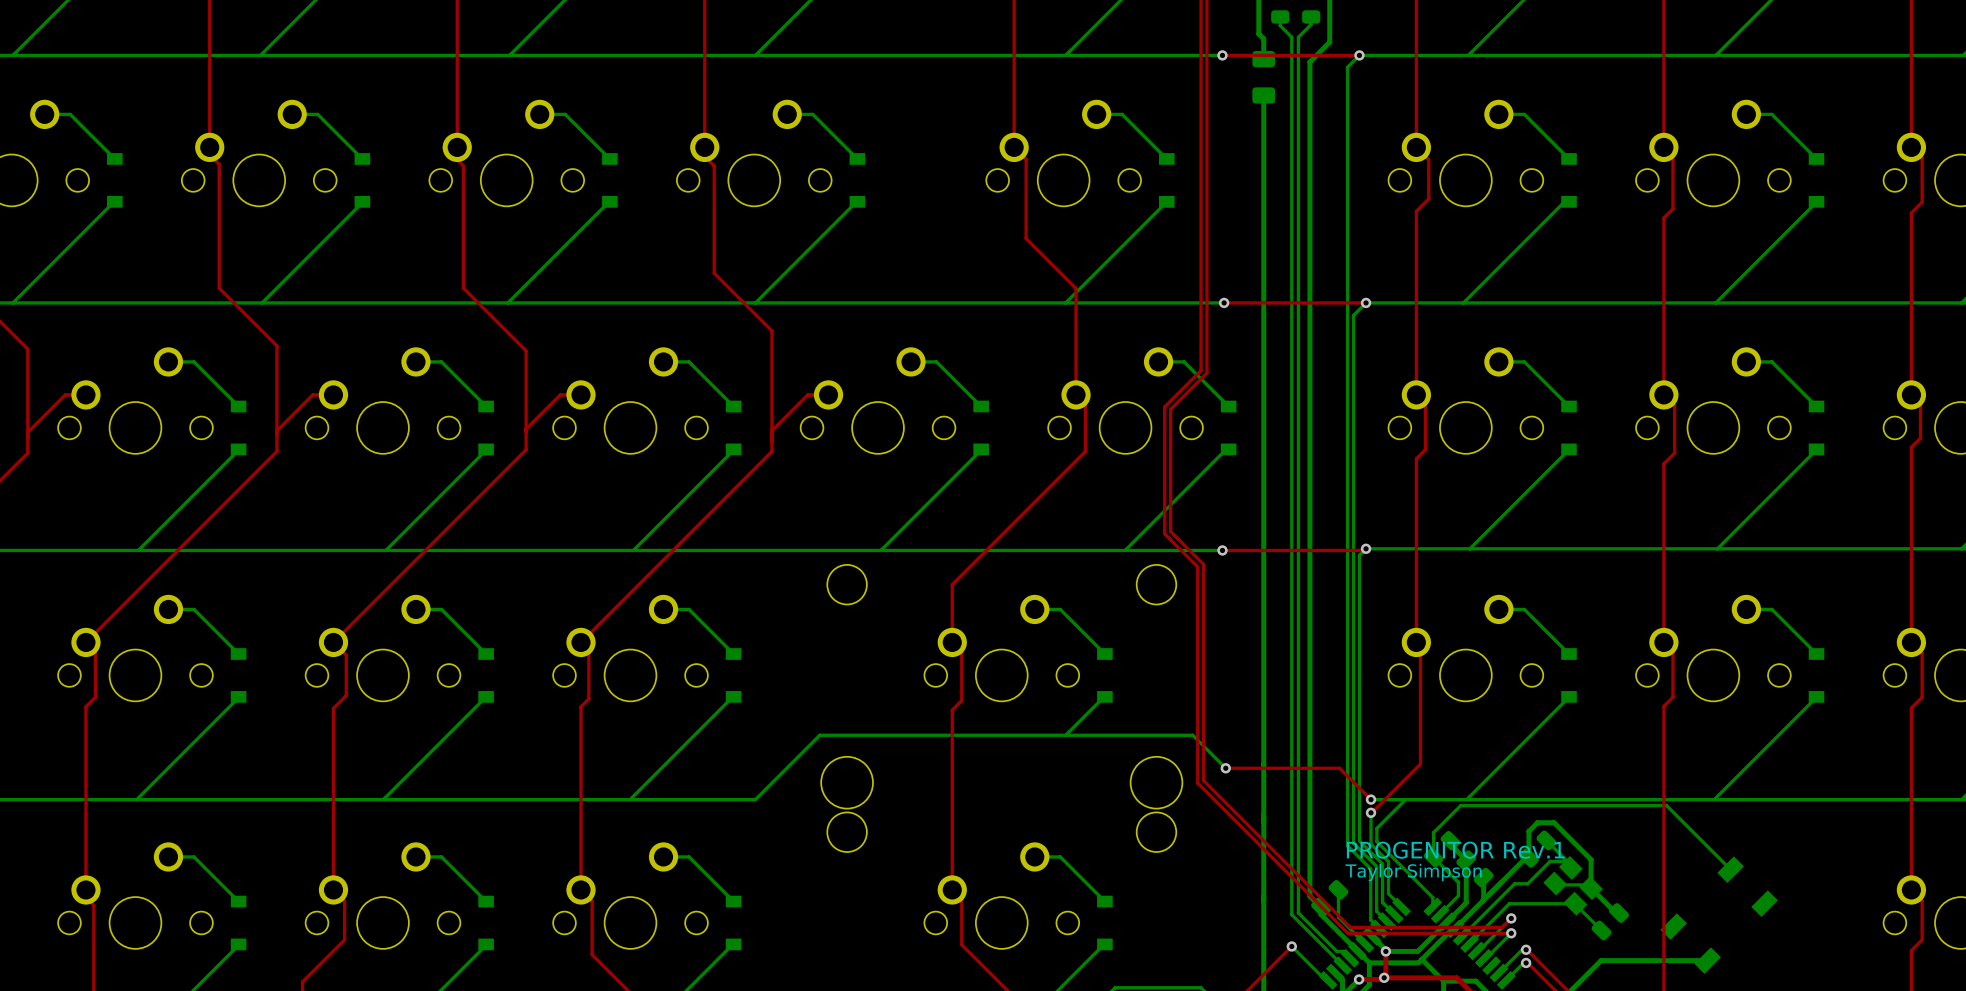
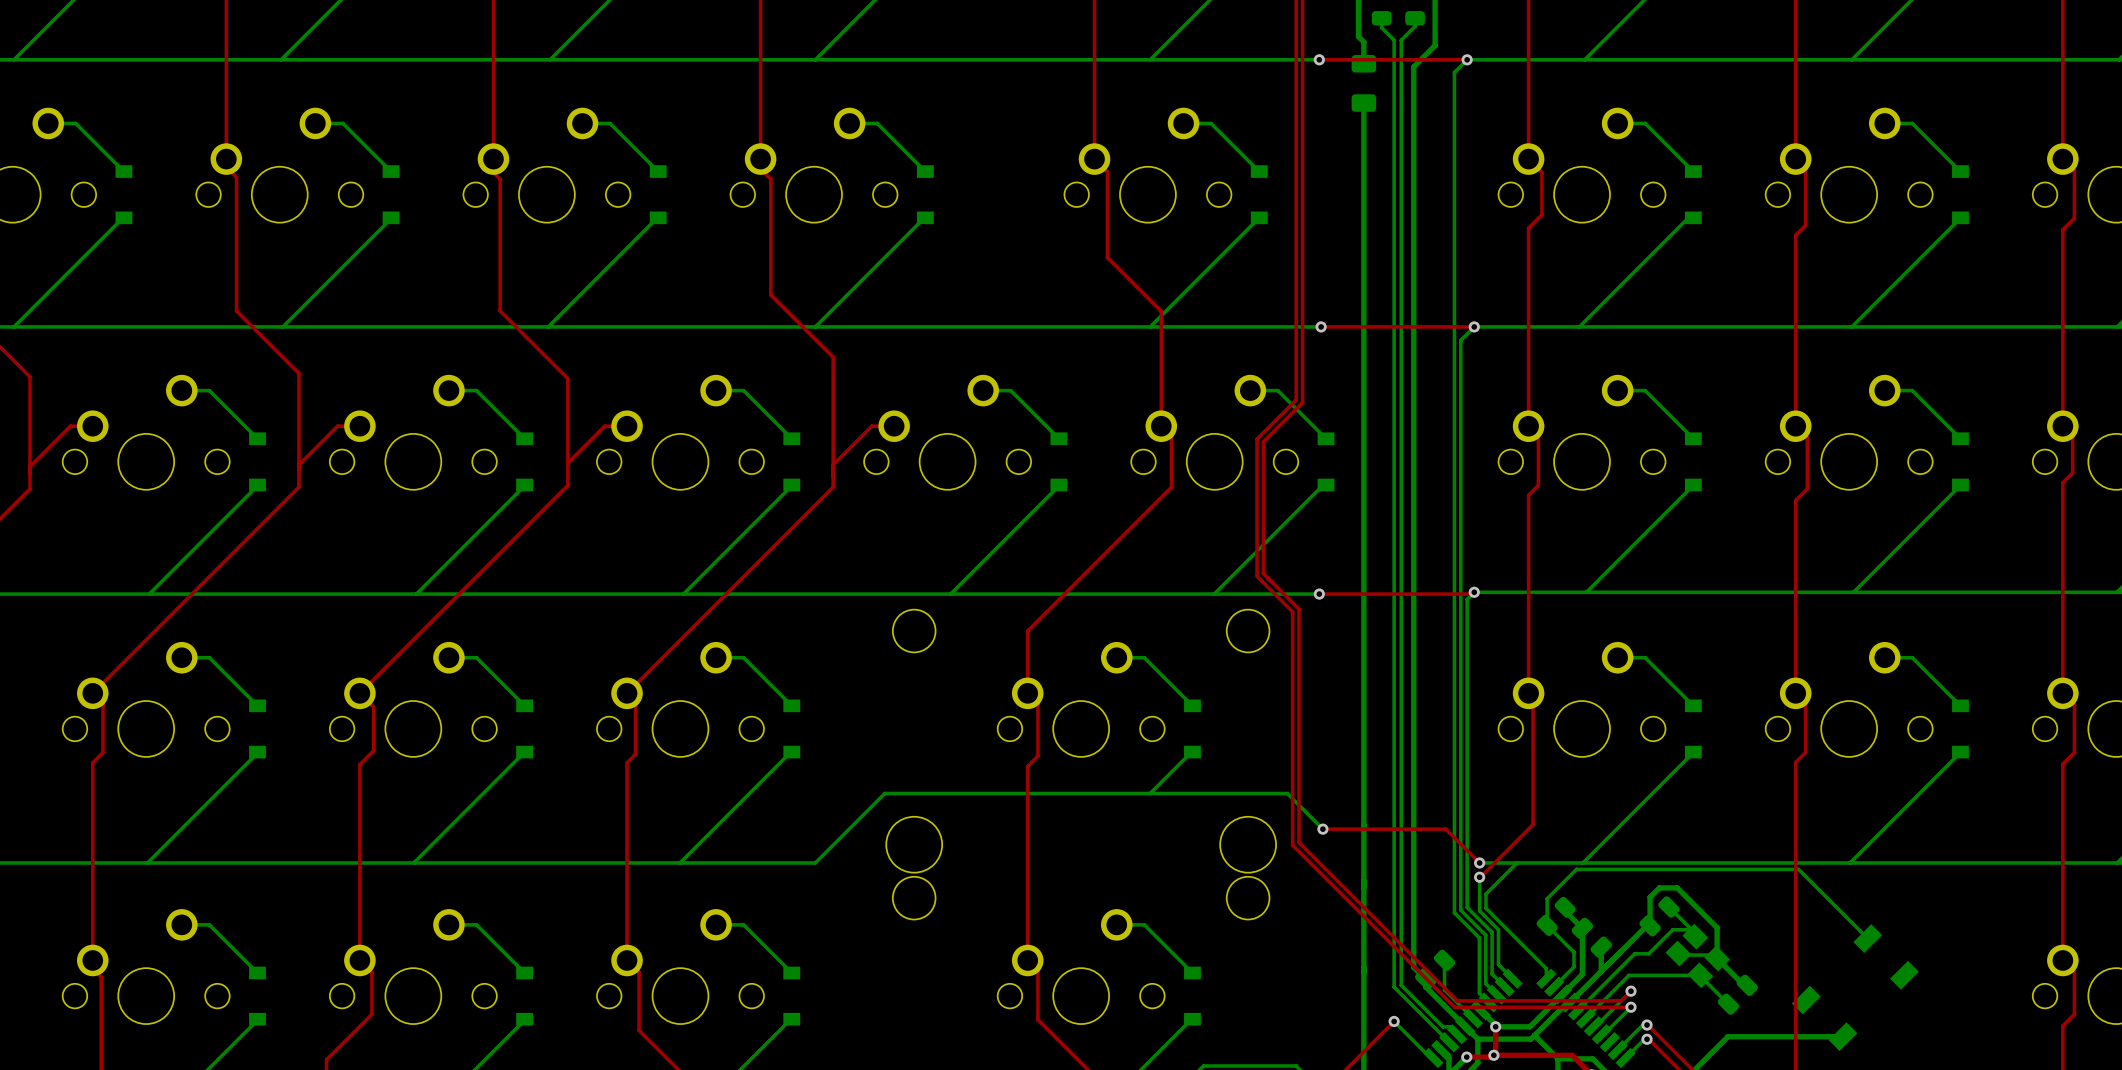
text: PROGENITOR Rev.1 (1455, 850) -> none
text: Taylor Simpson (1413, 872) -> none

